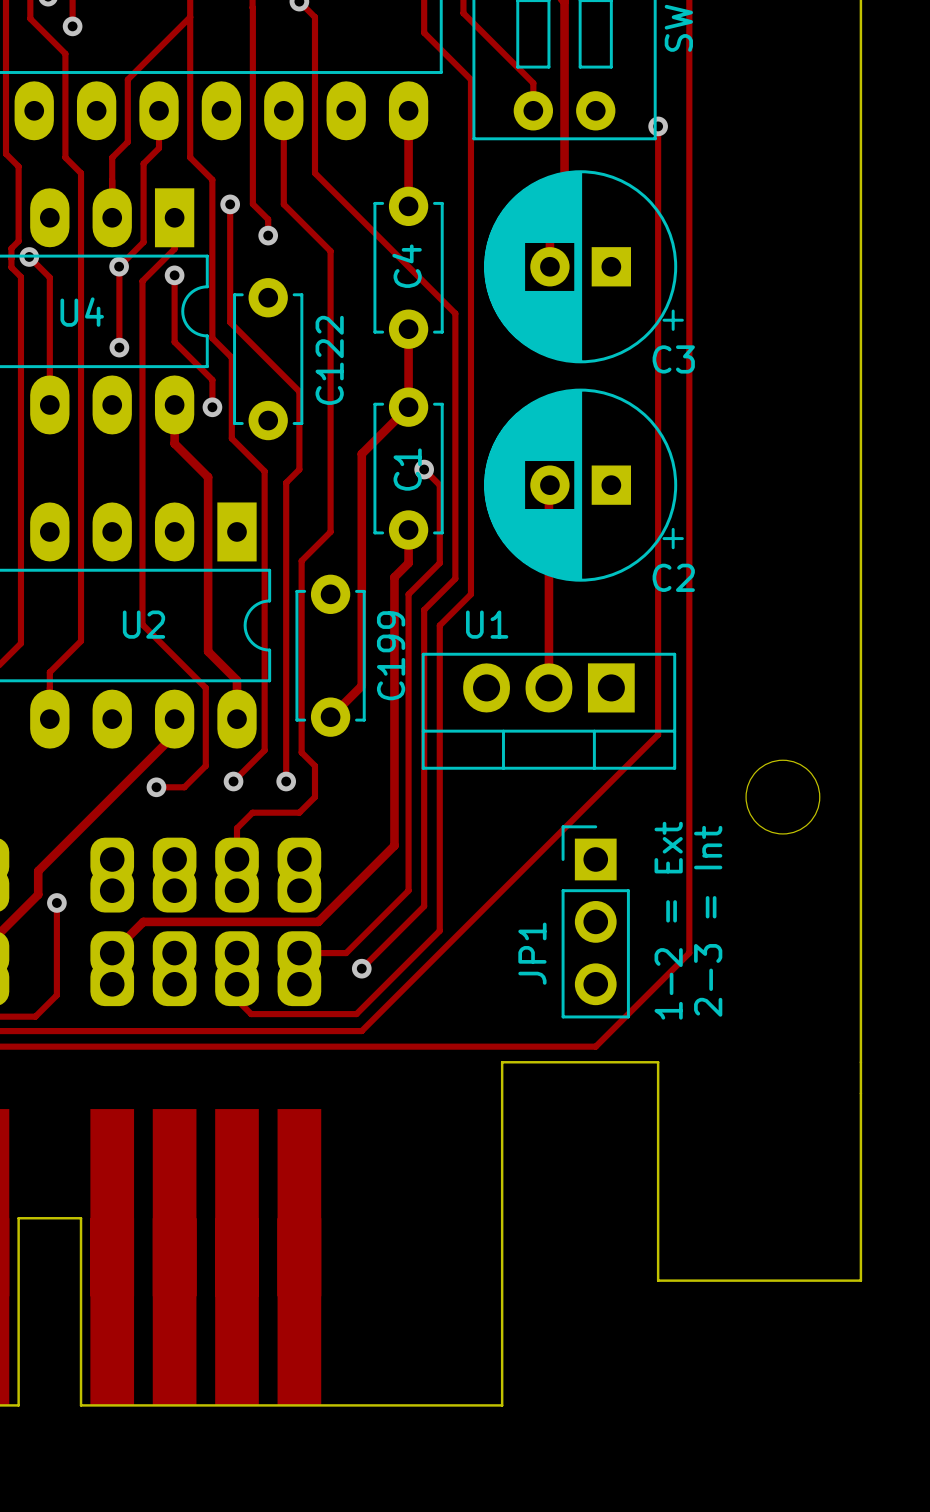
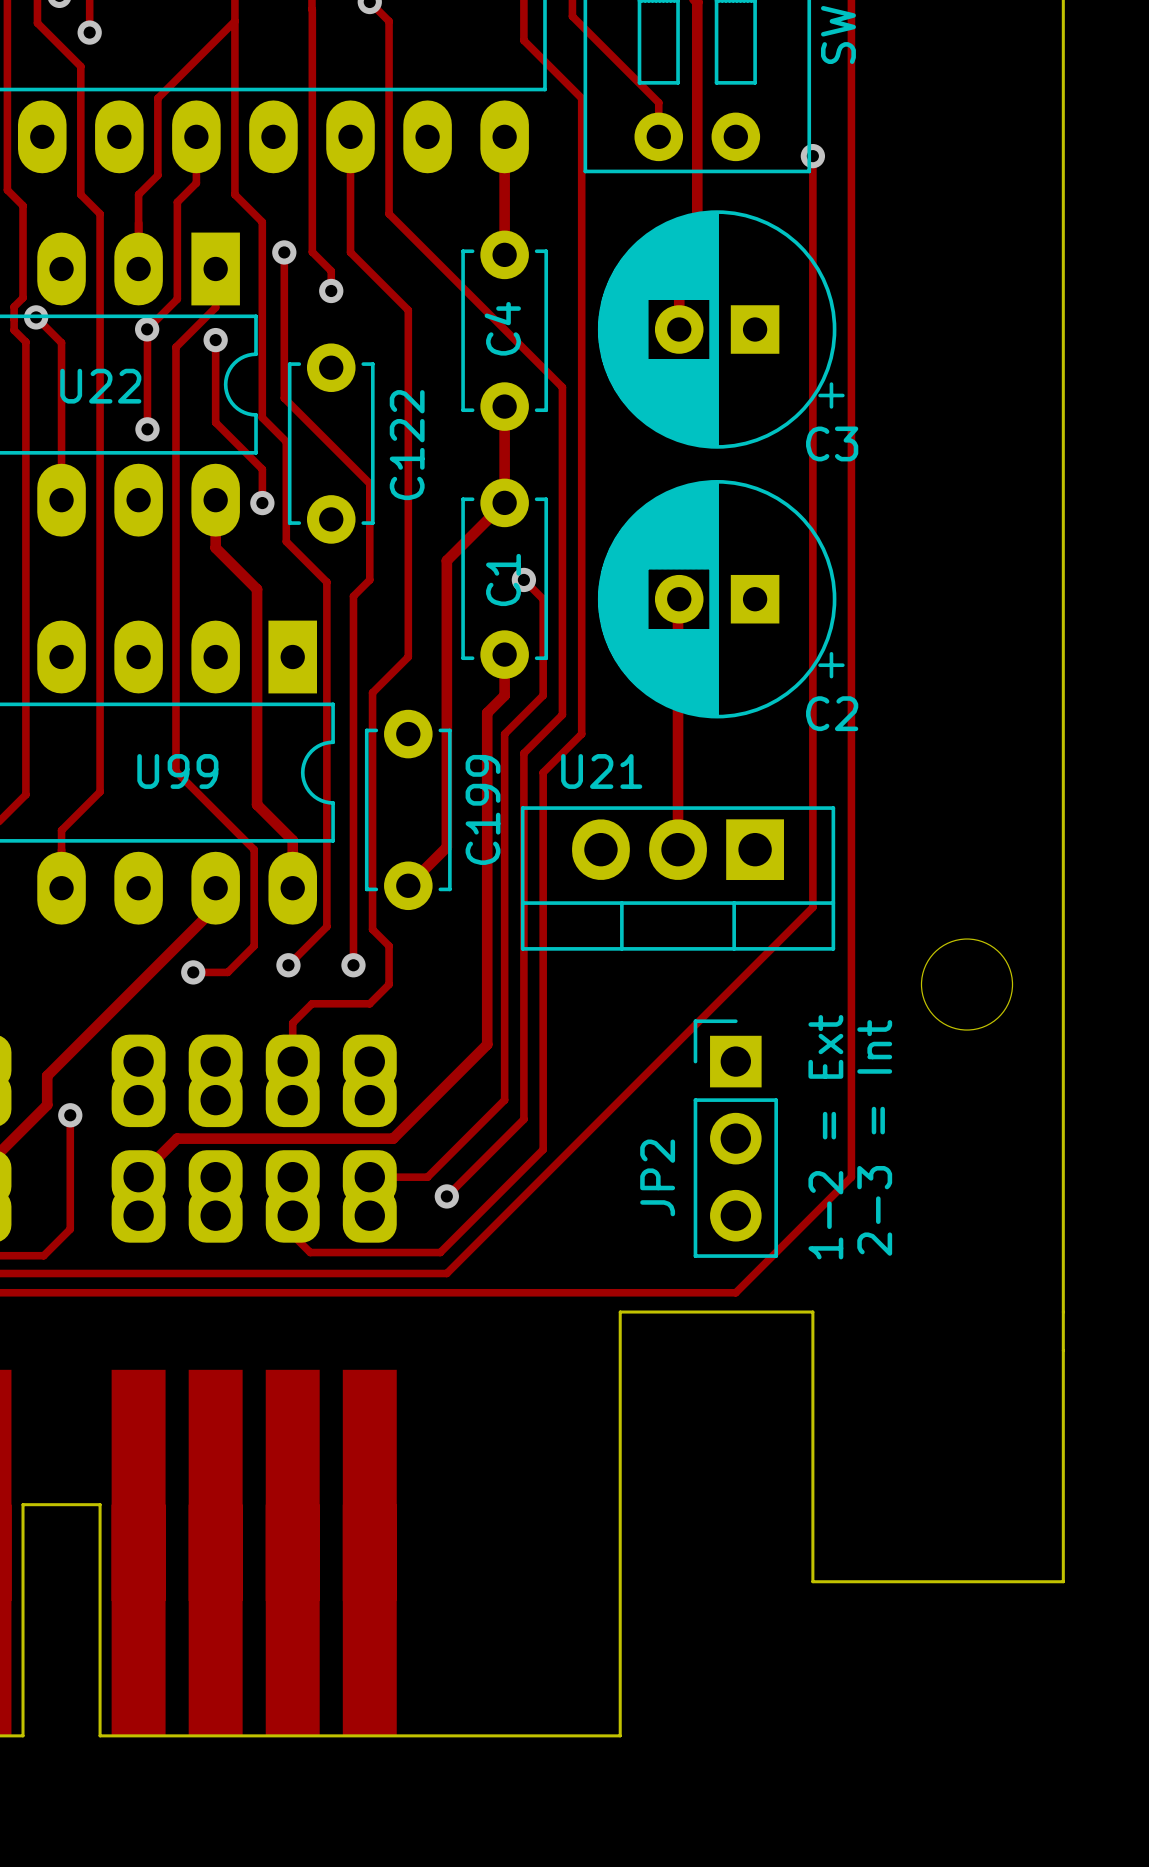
U4 name: U4 (82, 312) -> U22 (100, 386)
U2 name: U2 (144, 624) -> U99 (177, 771)
U1 name: U1 (487, 624) -> U21 (601, 771)
JP1 name: JP1 (532, 953) -> JP2 (657, 1177)

